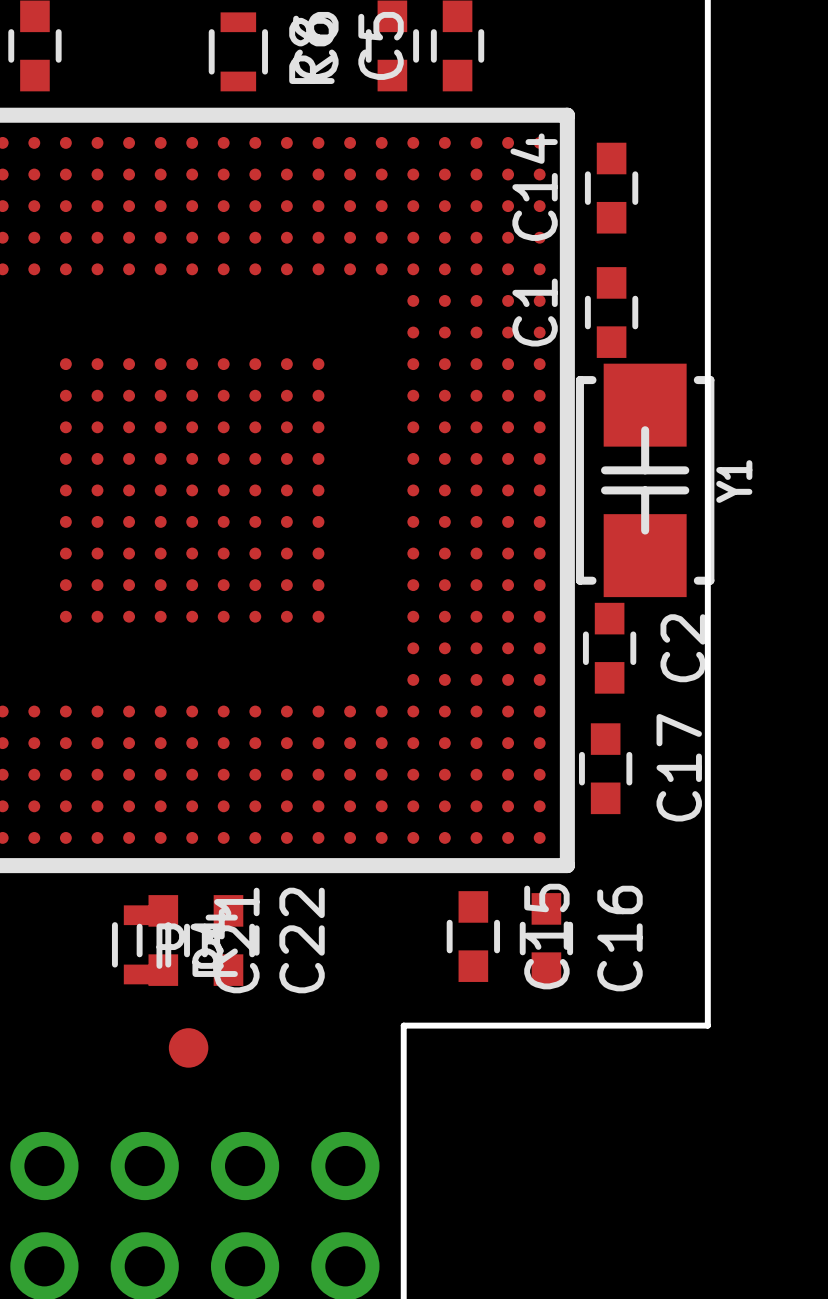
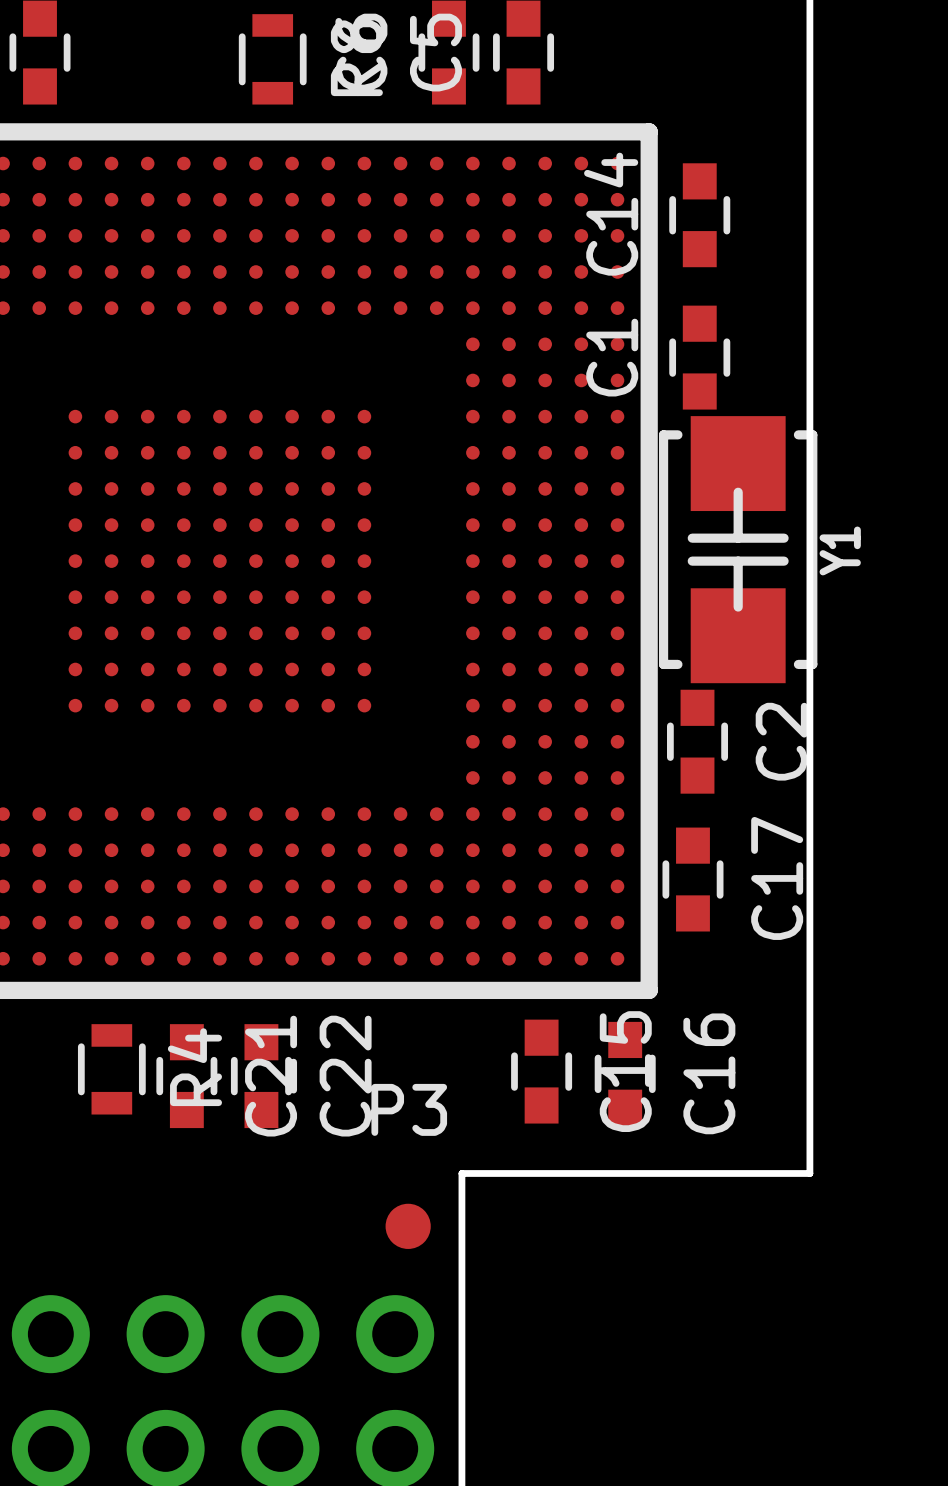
R4 position: (141, 944) -> (111, 1069)
P3 position: (188, 1047) -> (408, 1226)

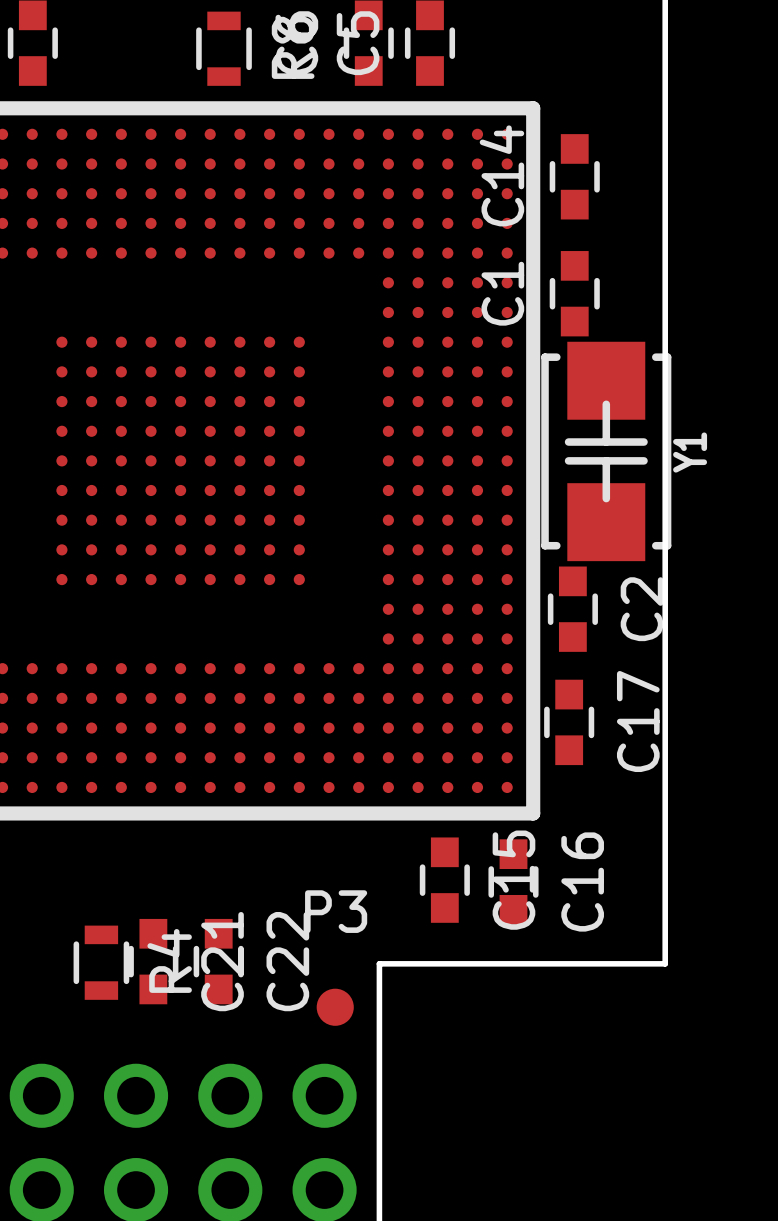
R4 position: (111, 1069) -> (101, 962)
C21 position: (186, 1076) -> (153, 961)
C22 position: (261, 1076) -> (218, 961)

